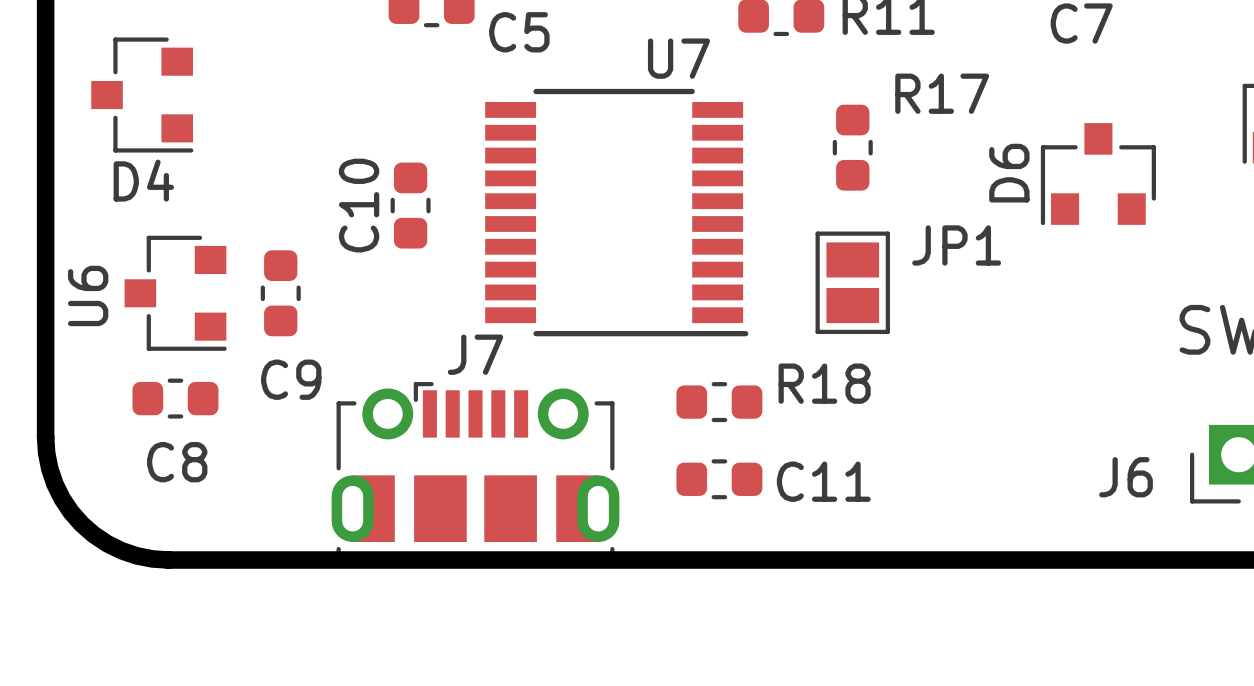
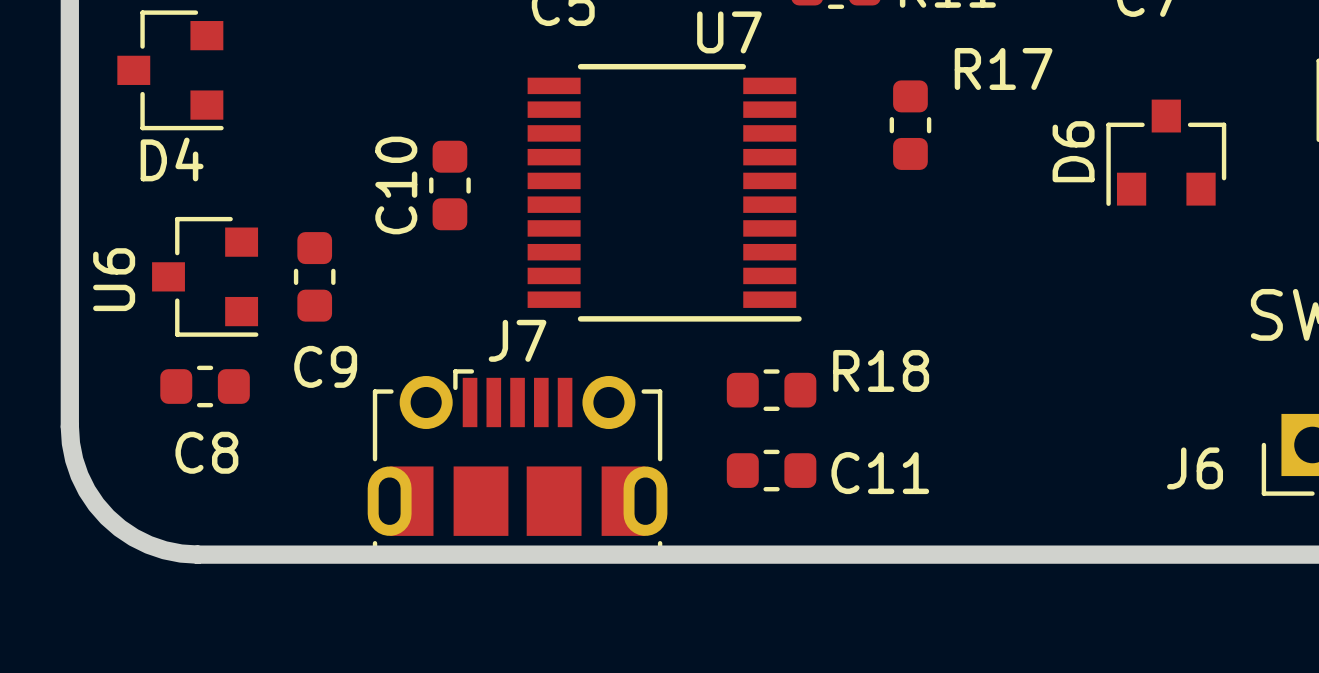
JP1: (852, 282) -> none

